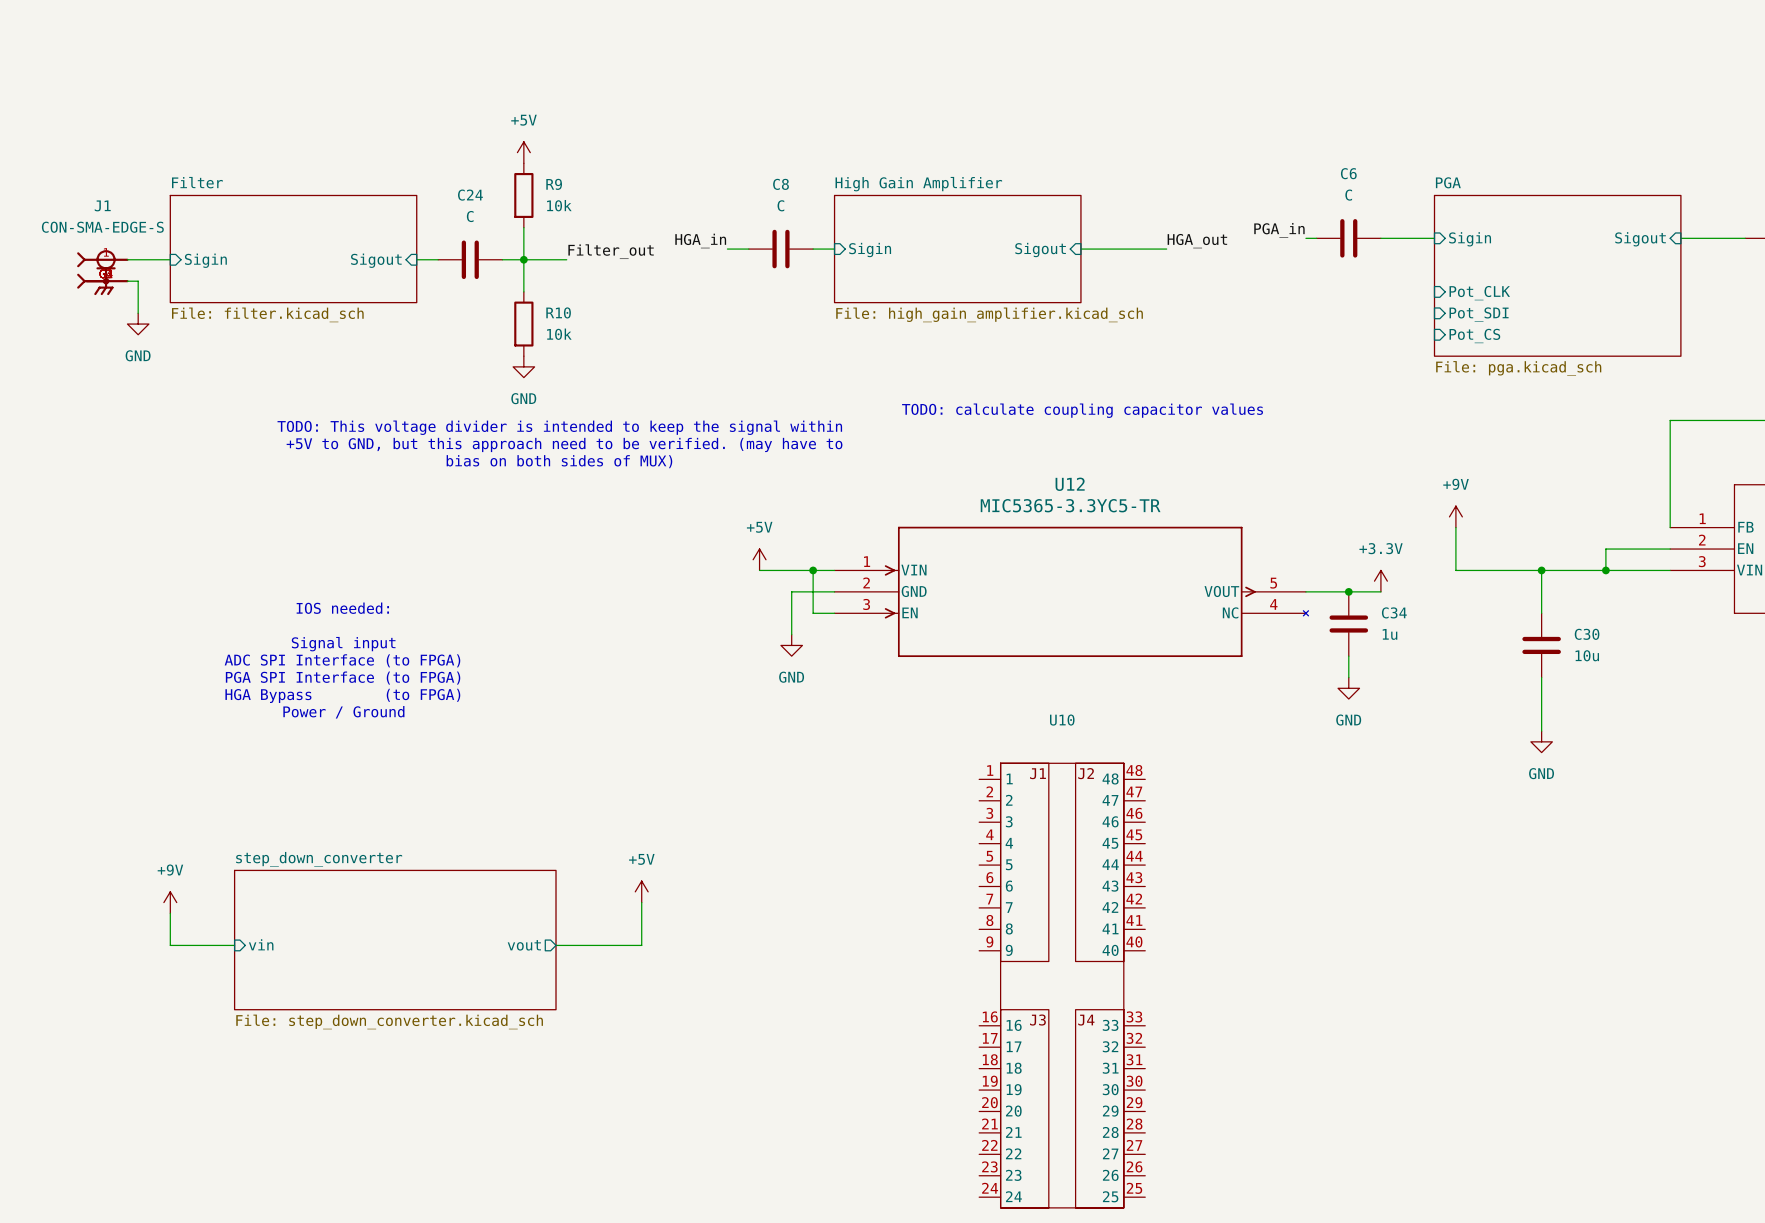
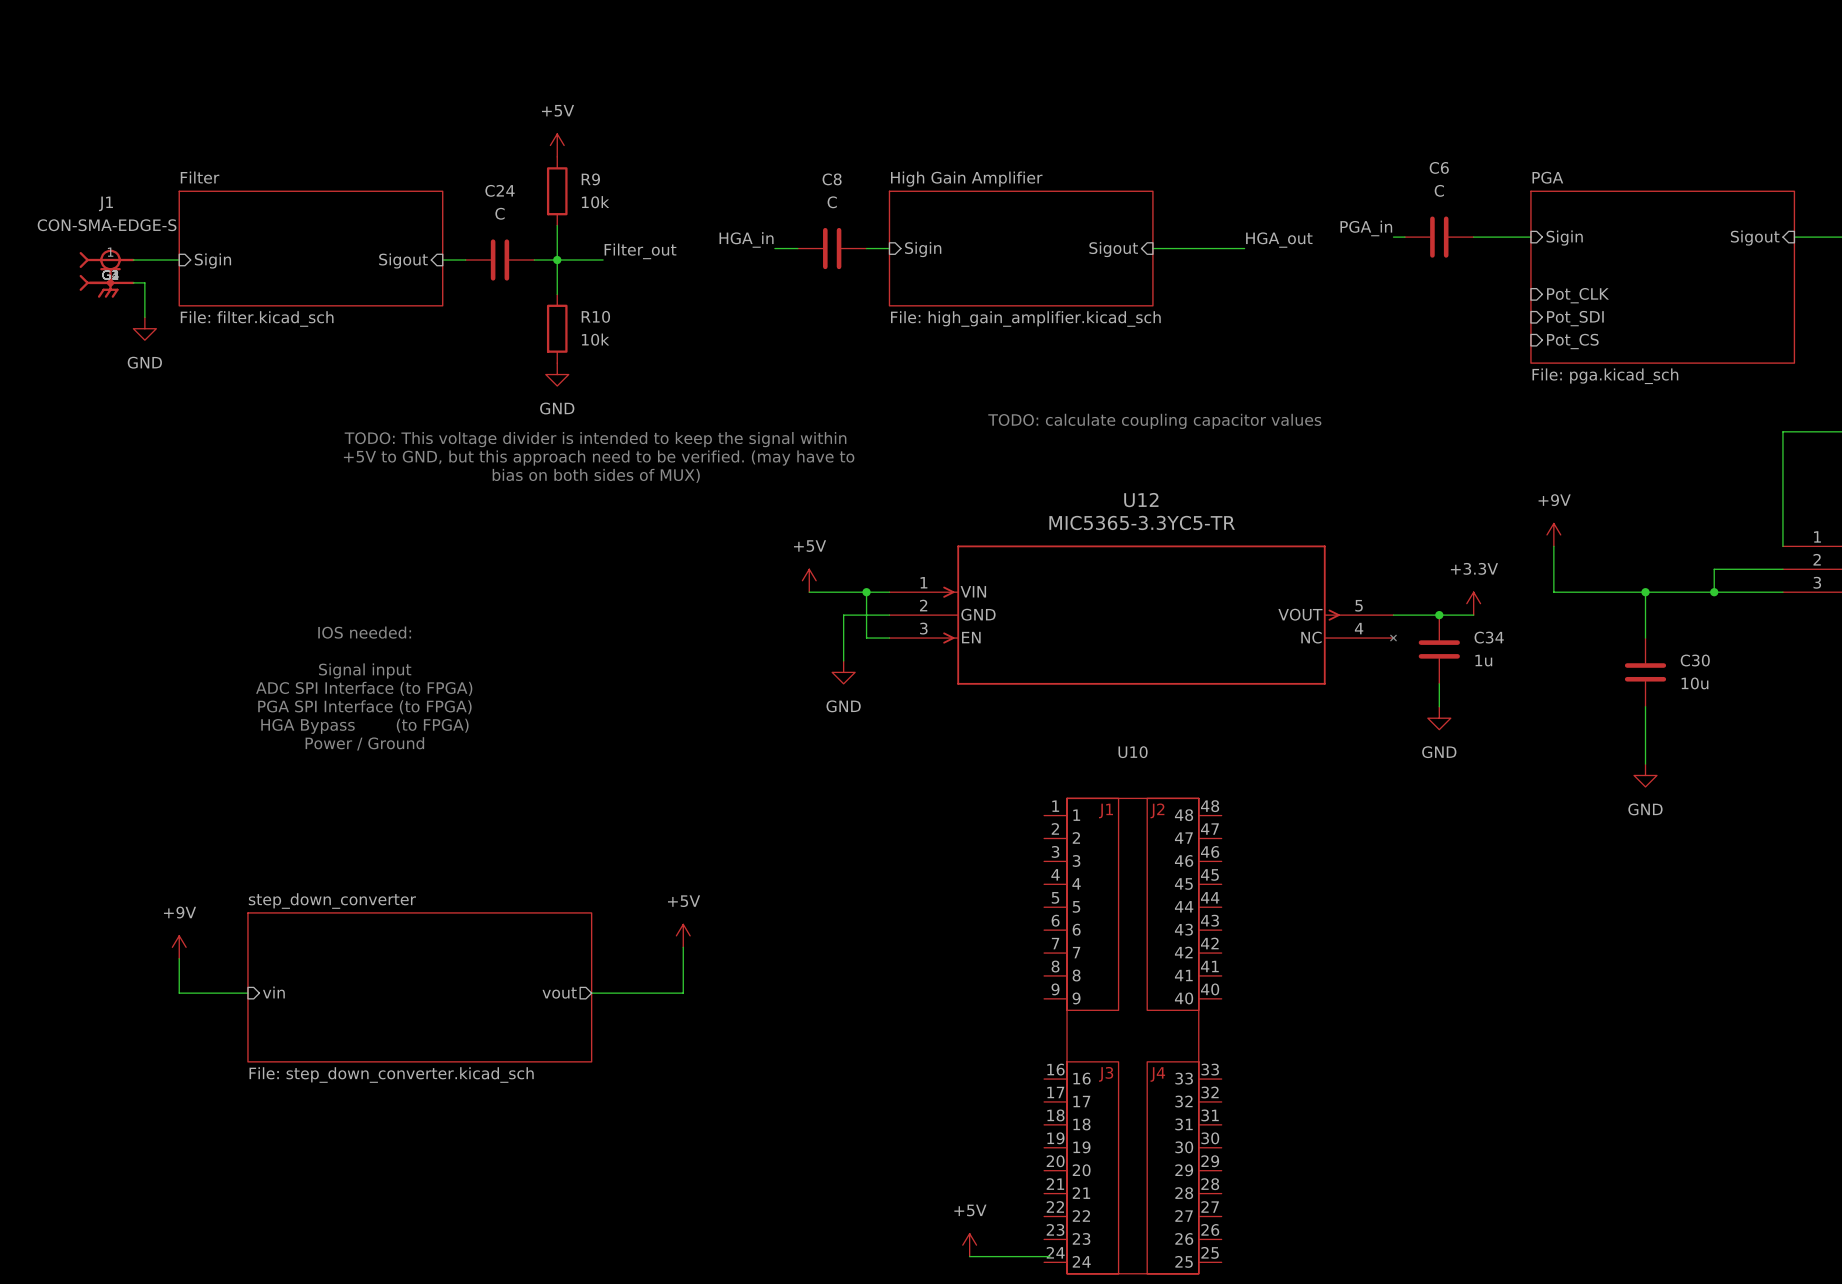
power symbol: none -> +5V (969, 1245)
wire: none -> (969, 1256) (1049, 1256)

